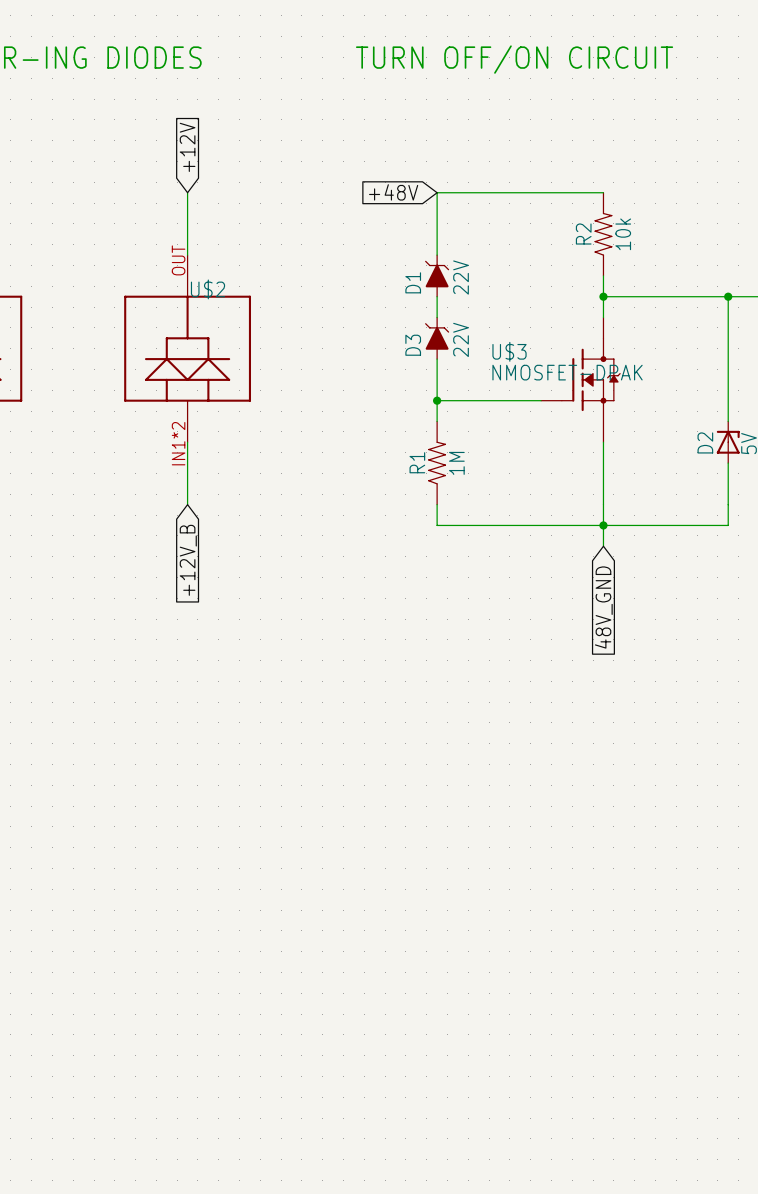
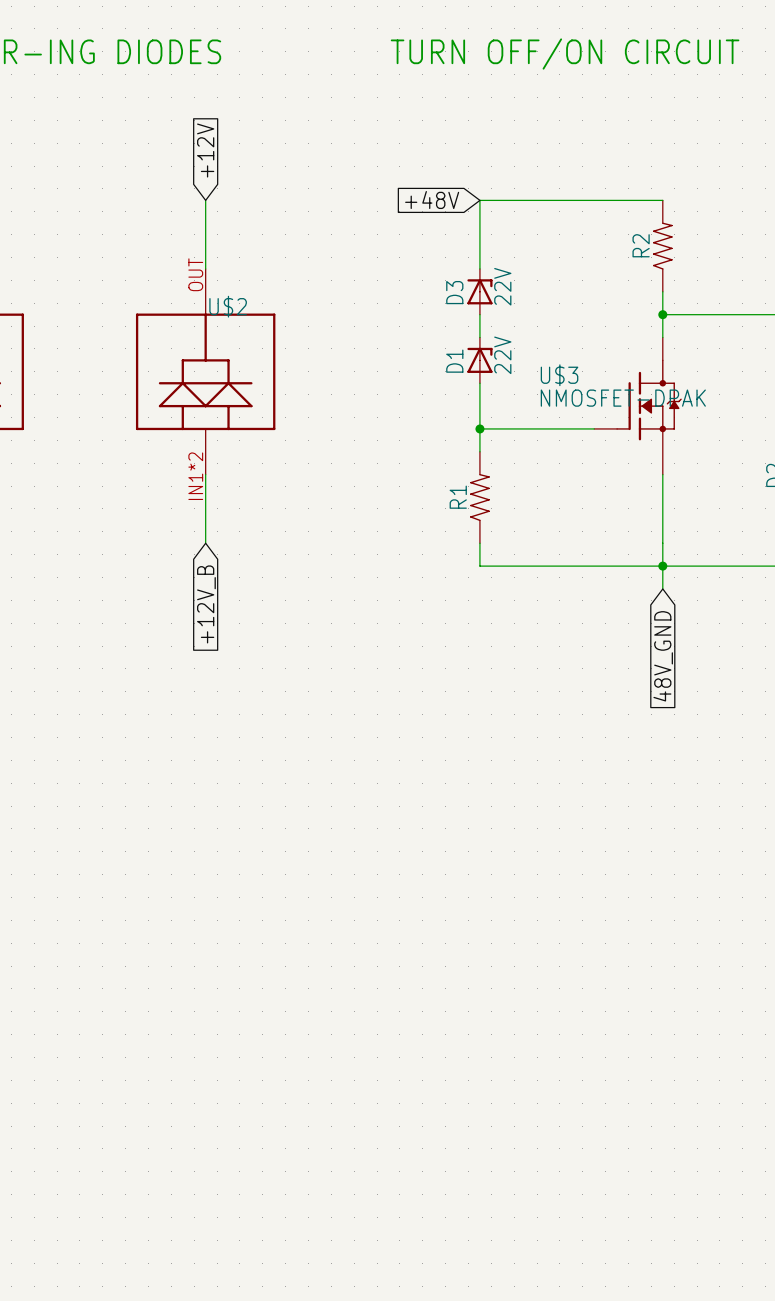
R2 value: 10k (623, 234) -> none
D1 symbol: [425, 254, 450, 298] -> [467, 337, 493, 384]
D3 symbol: [425, 316, 450, 360] -> [467, 268, 493, 315]
R1 value: 1M (456, 463) -> none

